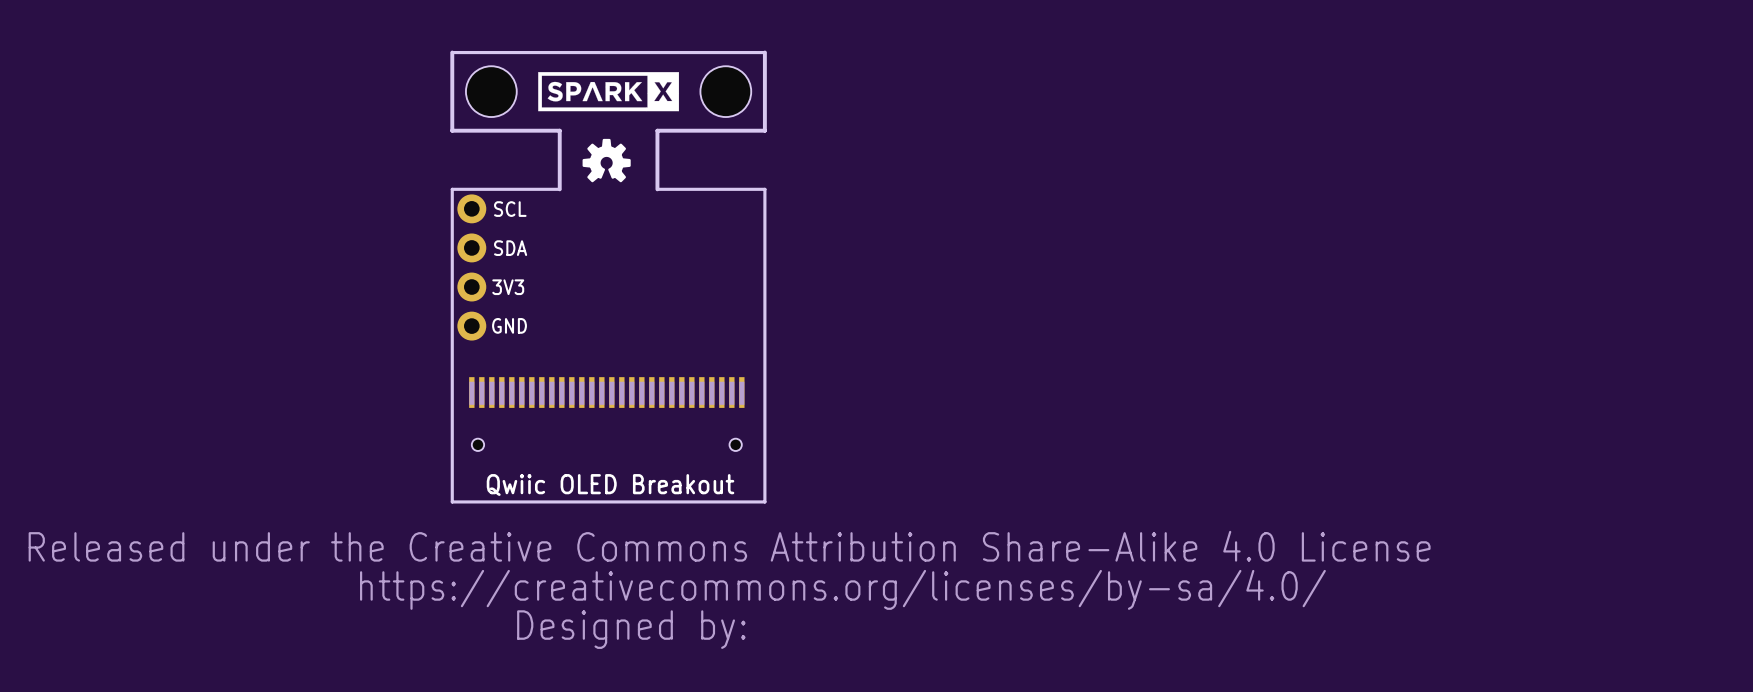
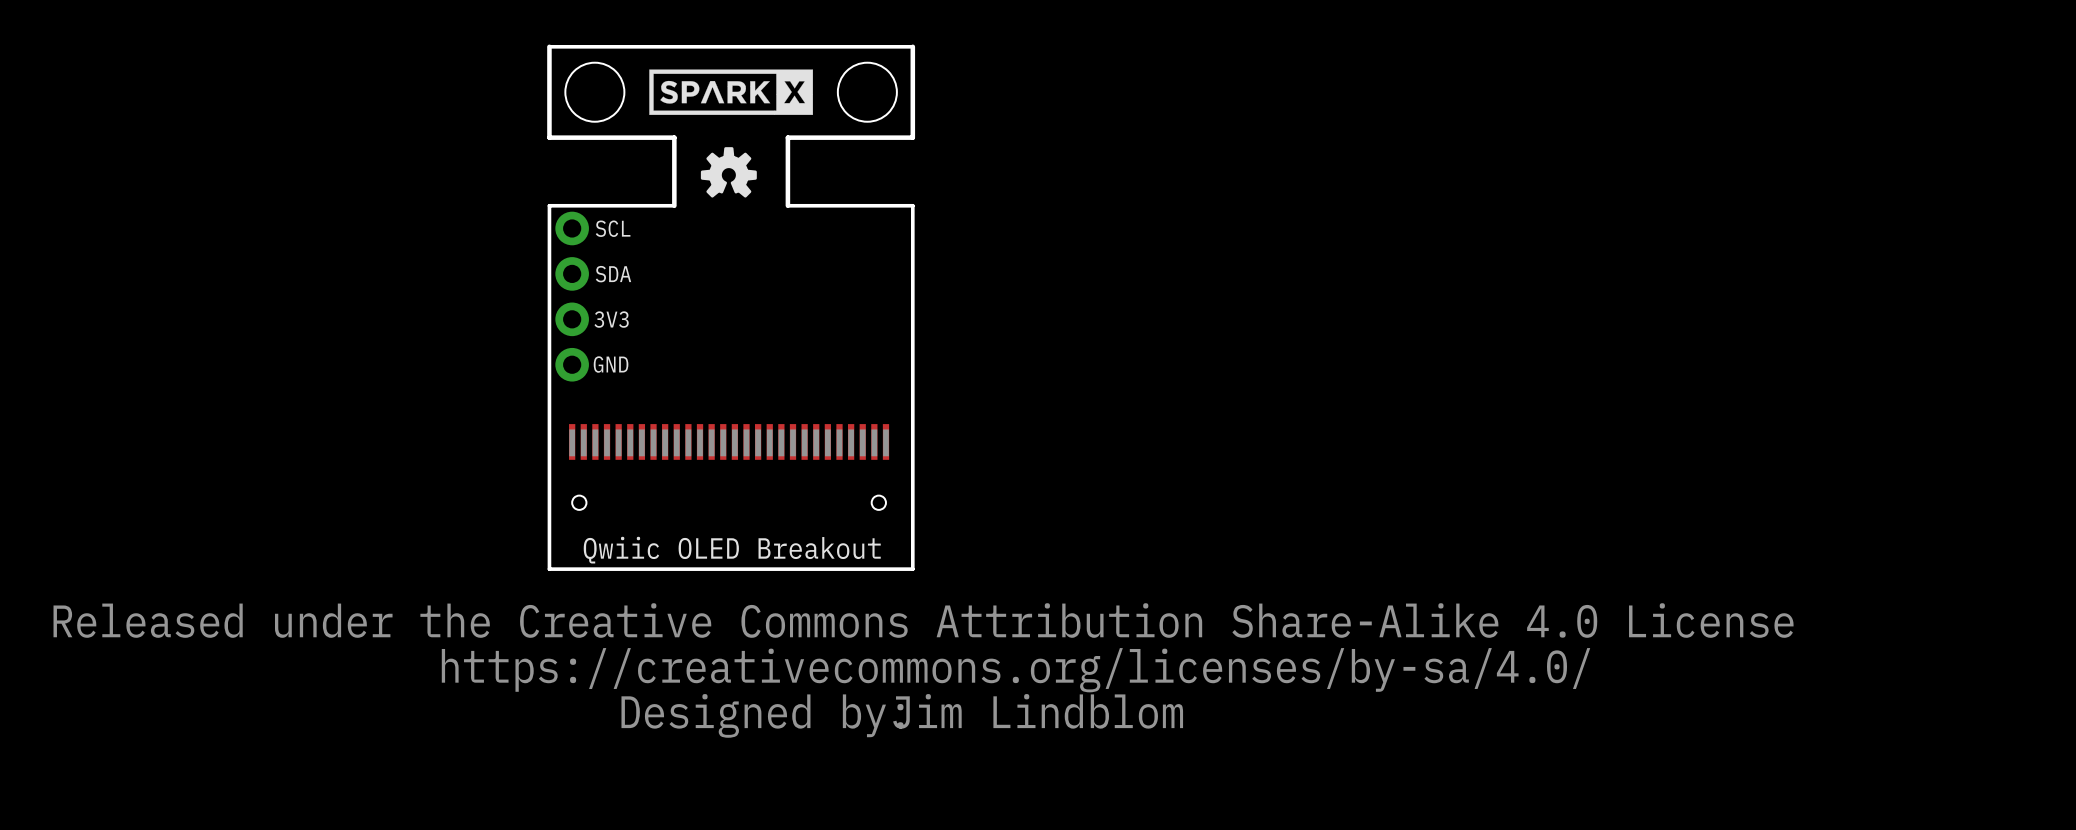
text: none -> Jim Lindblom (1038, 711)

